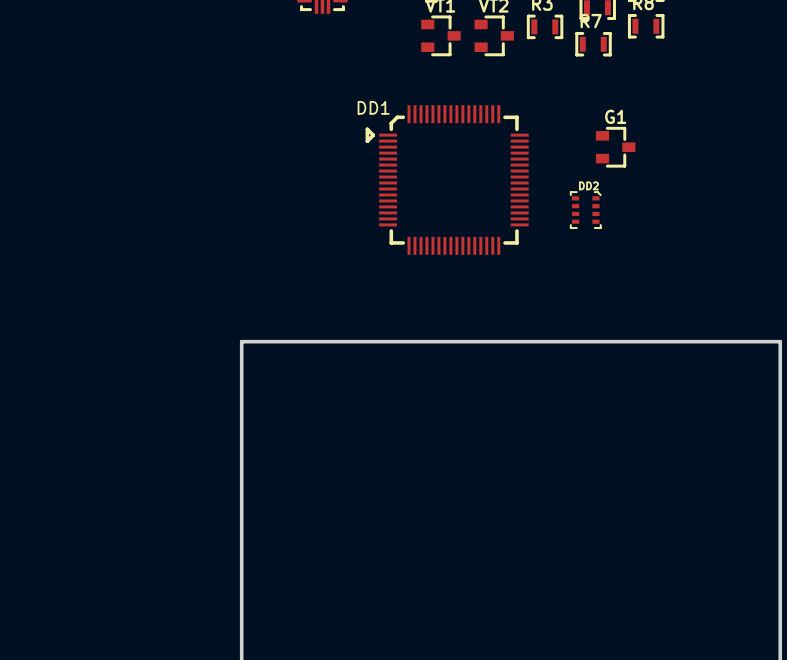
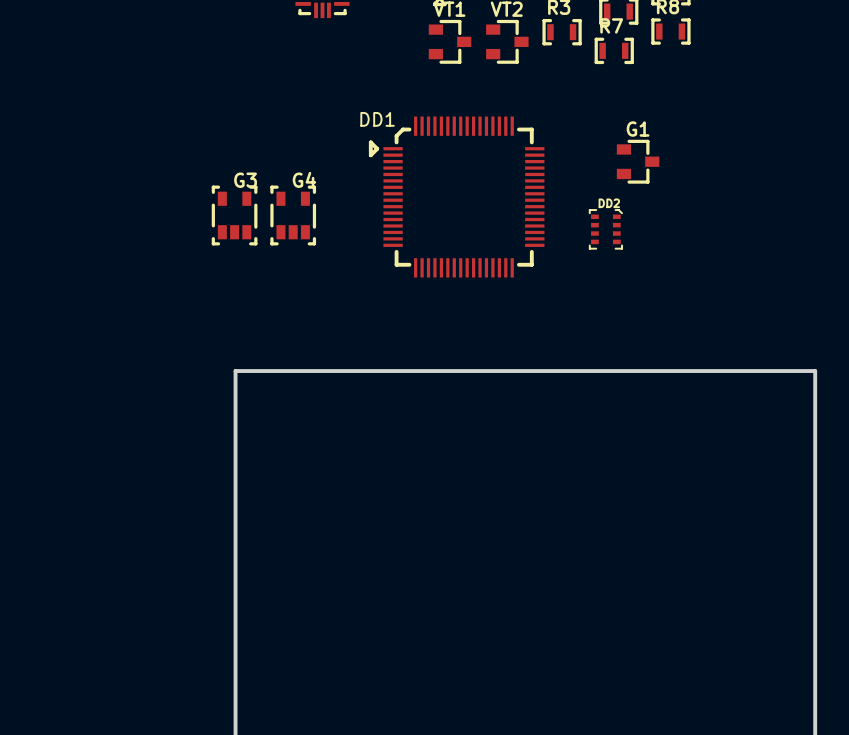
G3: none -> (234, 215)
G4: none -> (293, 215)

